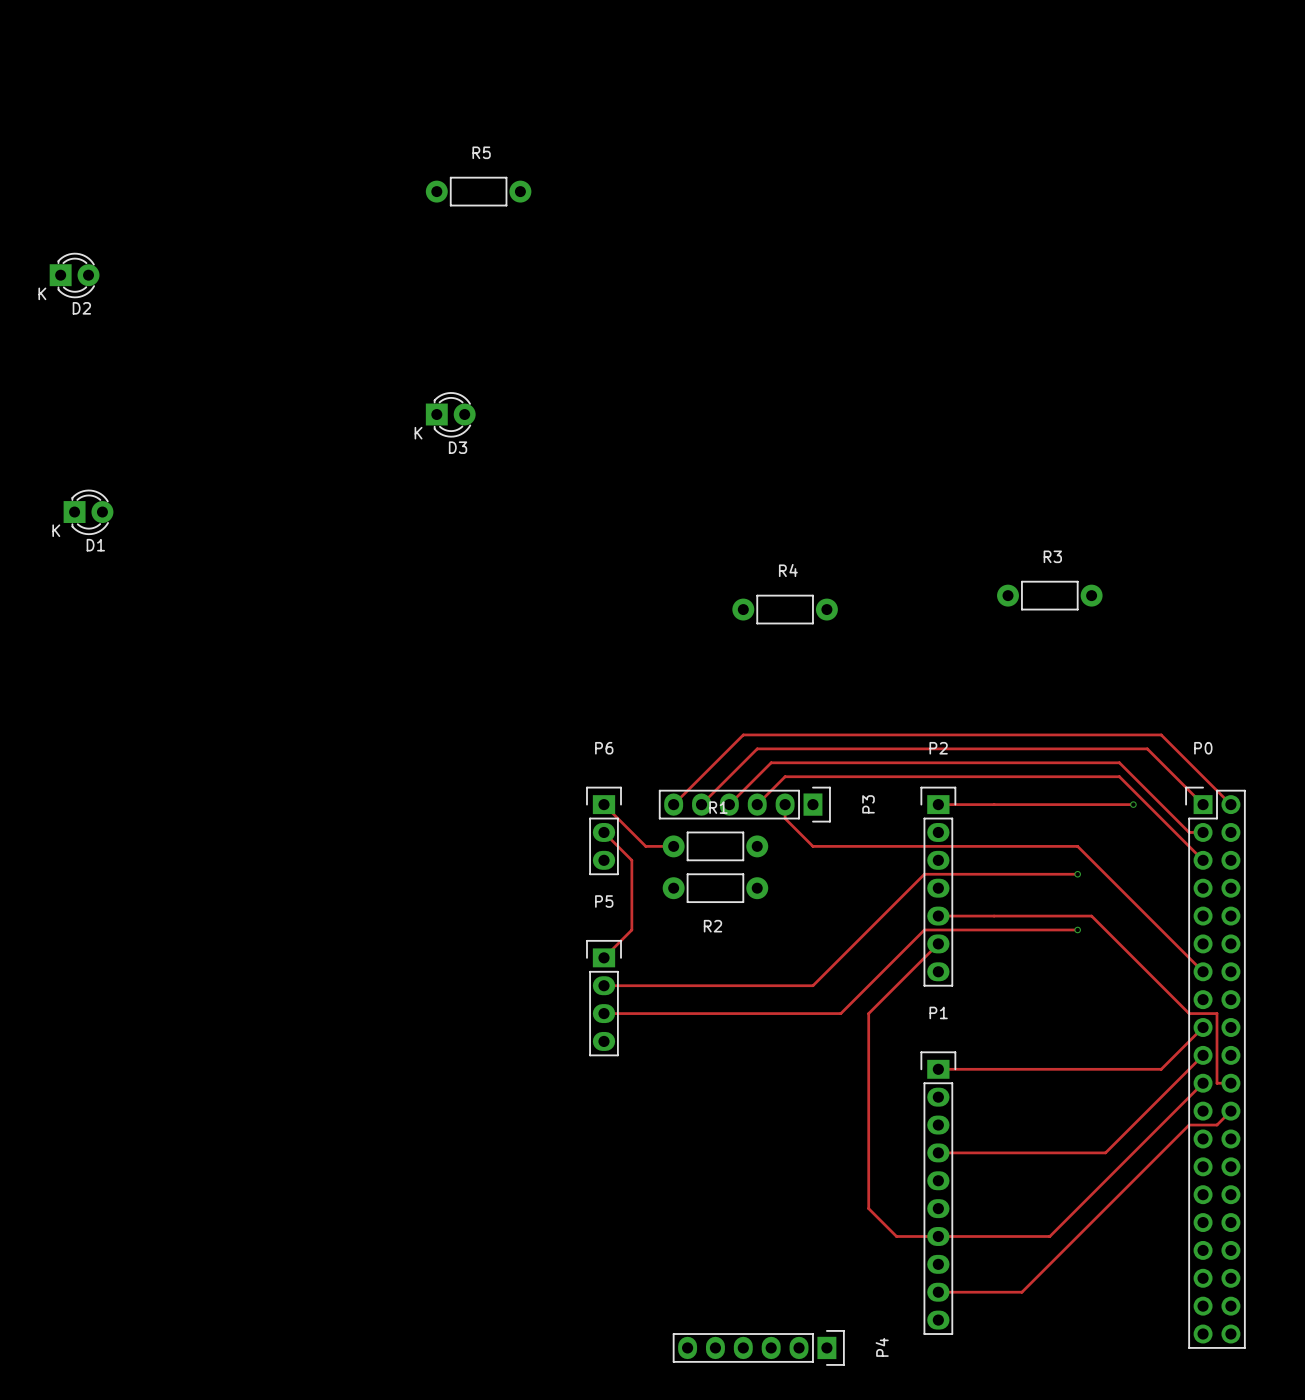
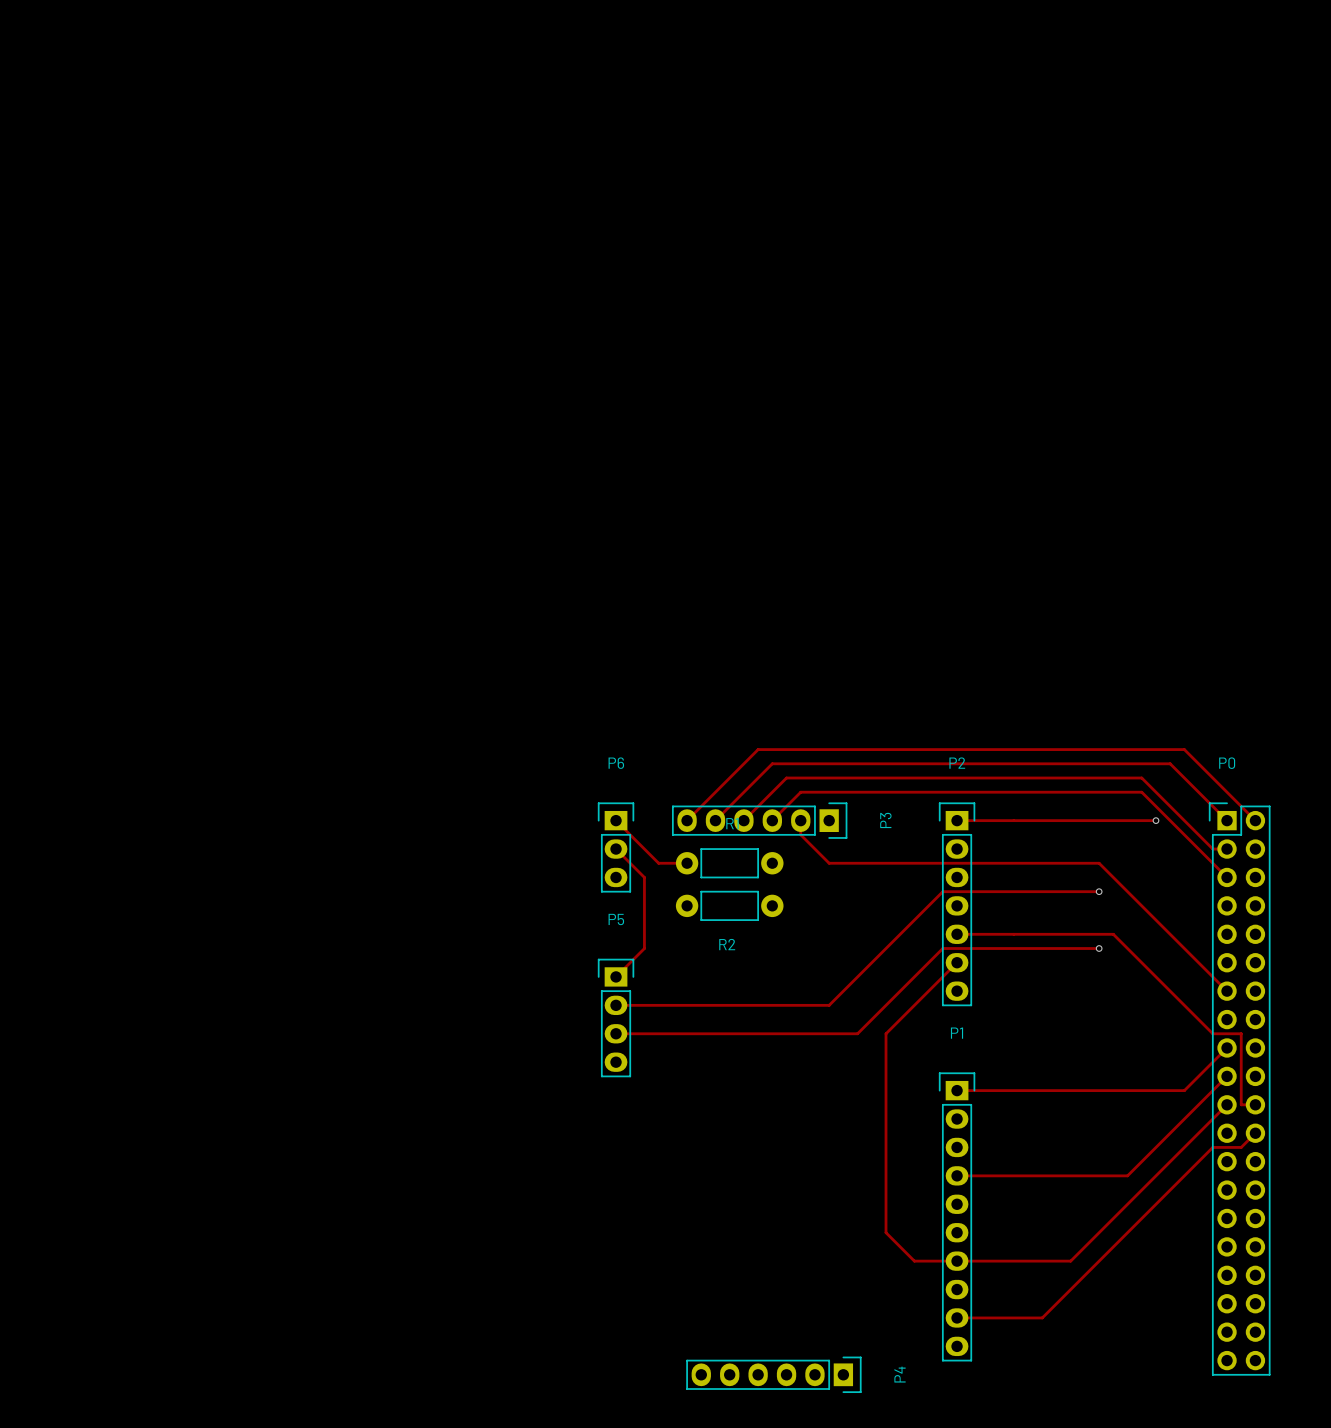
R5: (478, 191) -> none
D2: (74, 275) -> none
D3: (450, 414) -> none
D1: (88, 512) -> none
R3: (1049, 595) -> none
R4: (785, 609) -> none

